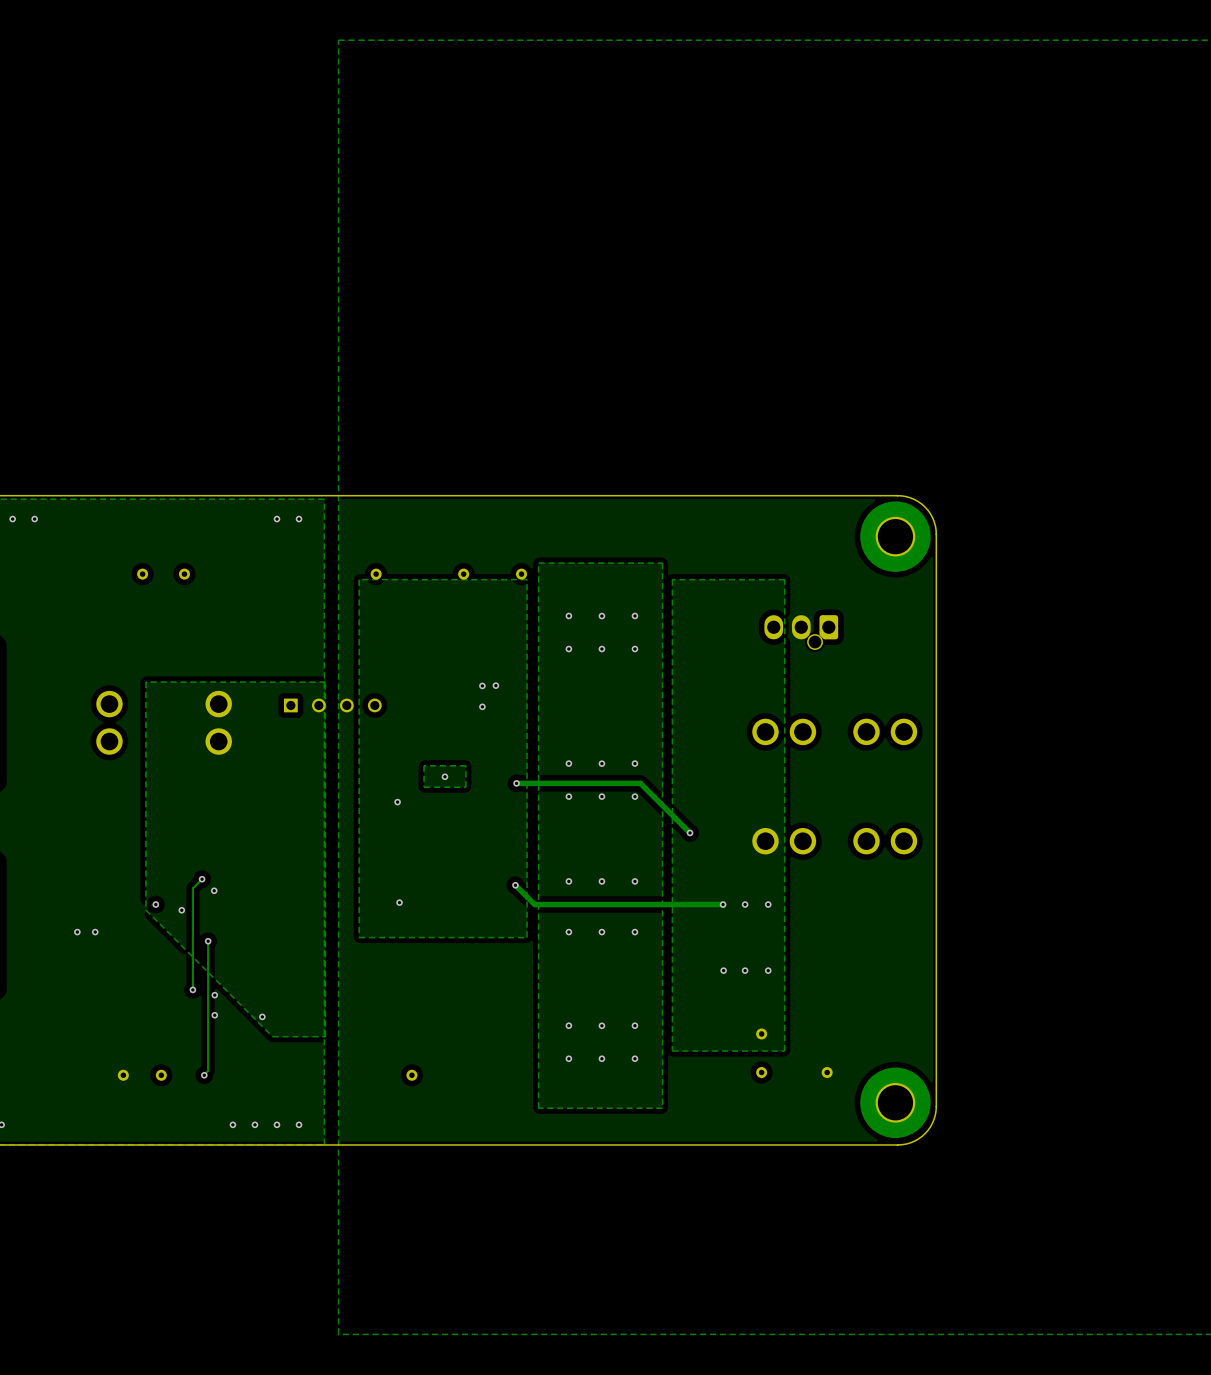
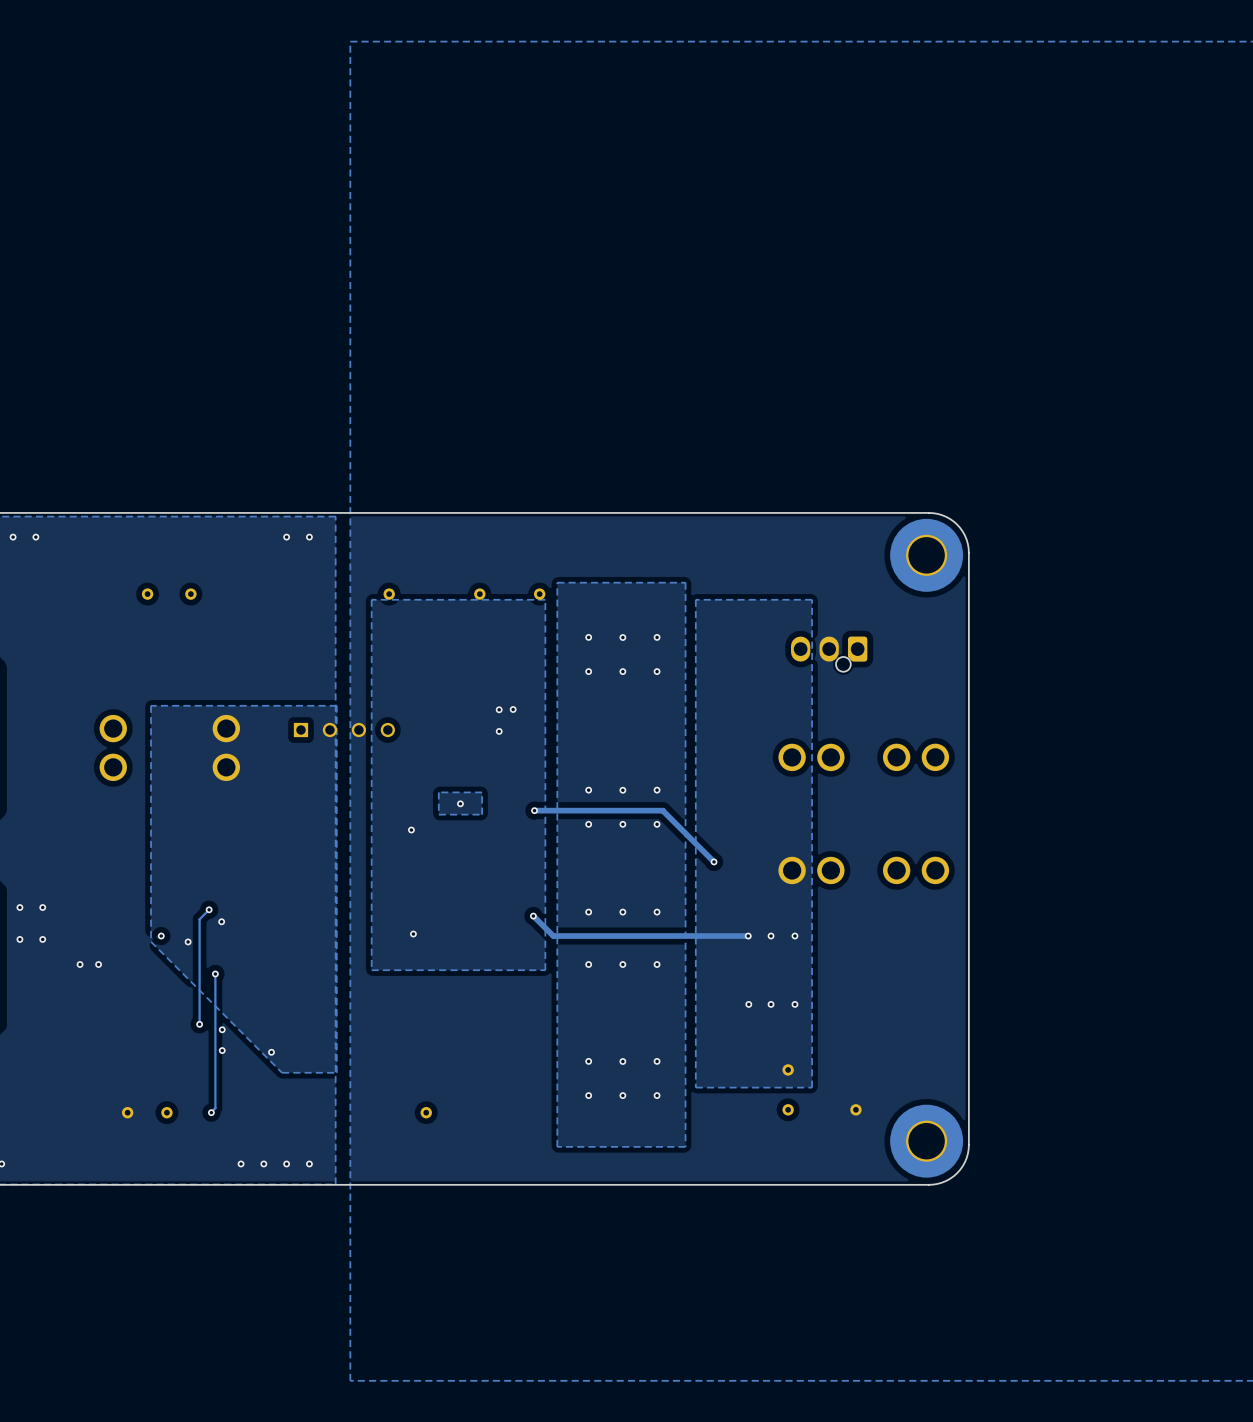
via: none -> (19, 907)
via: none -> (42, 907)
via: none -> (19, 939)
via: none -> (42, 939)

